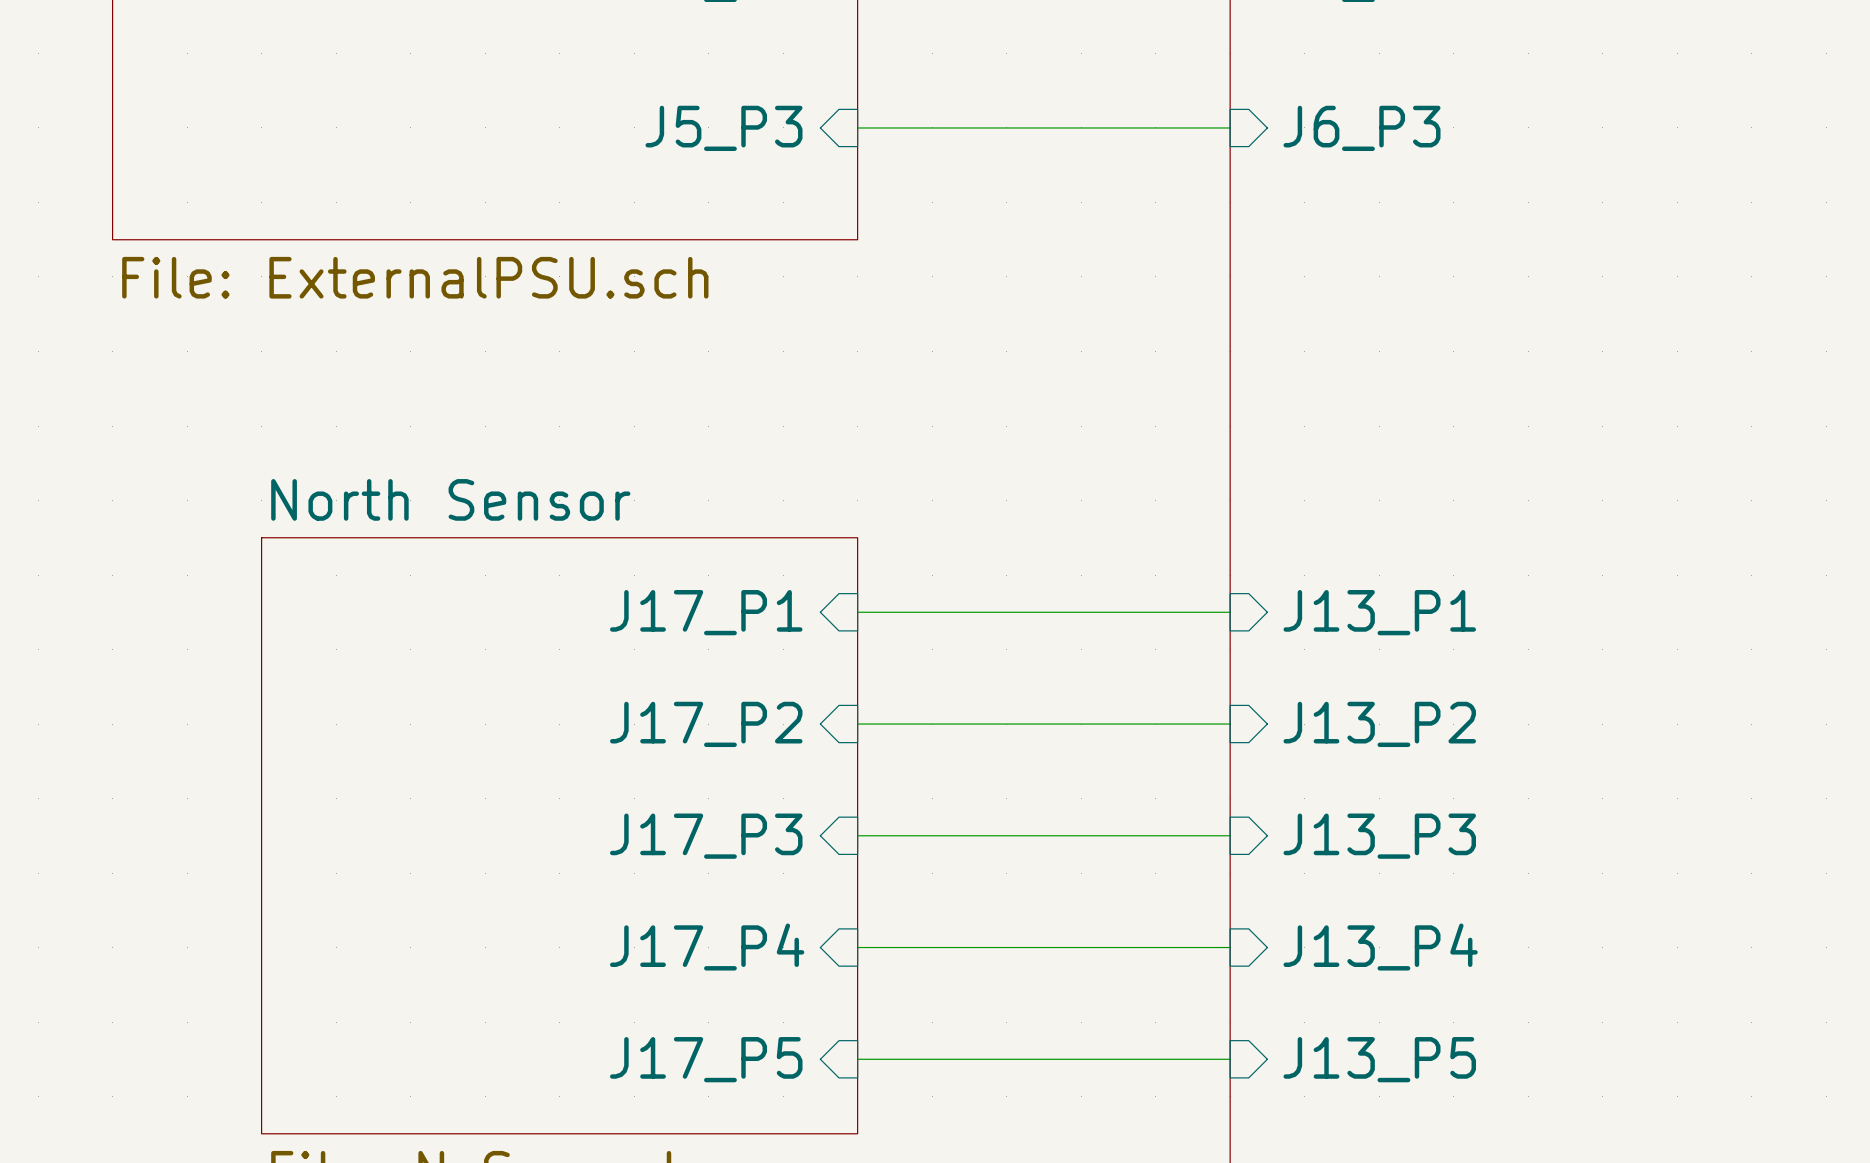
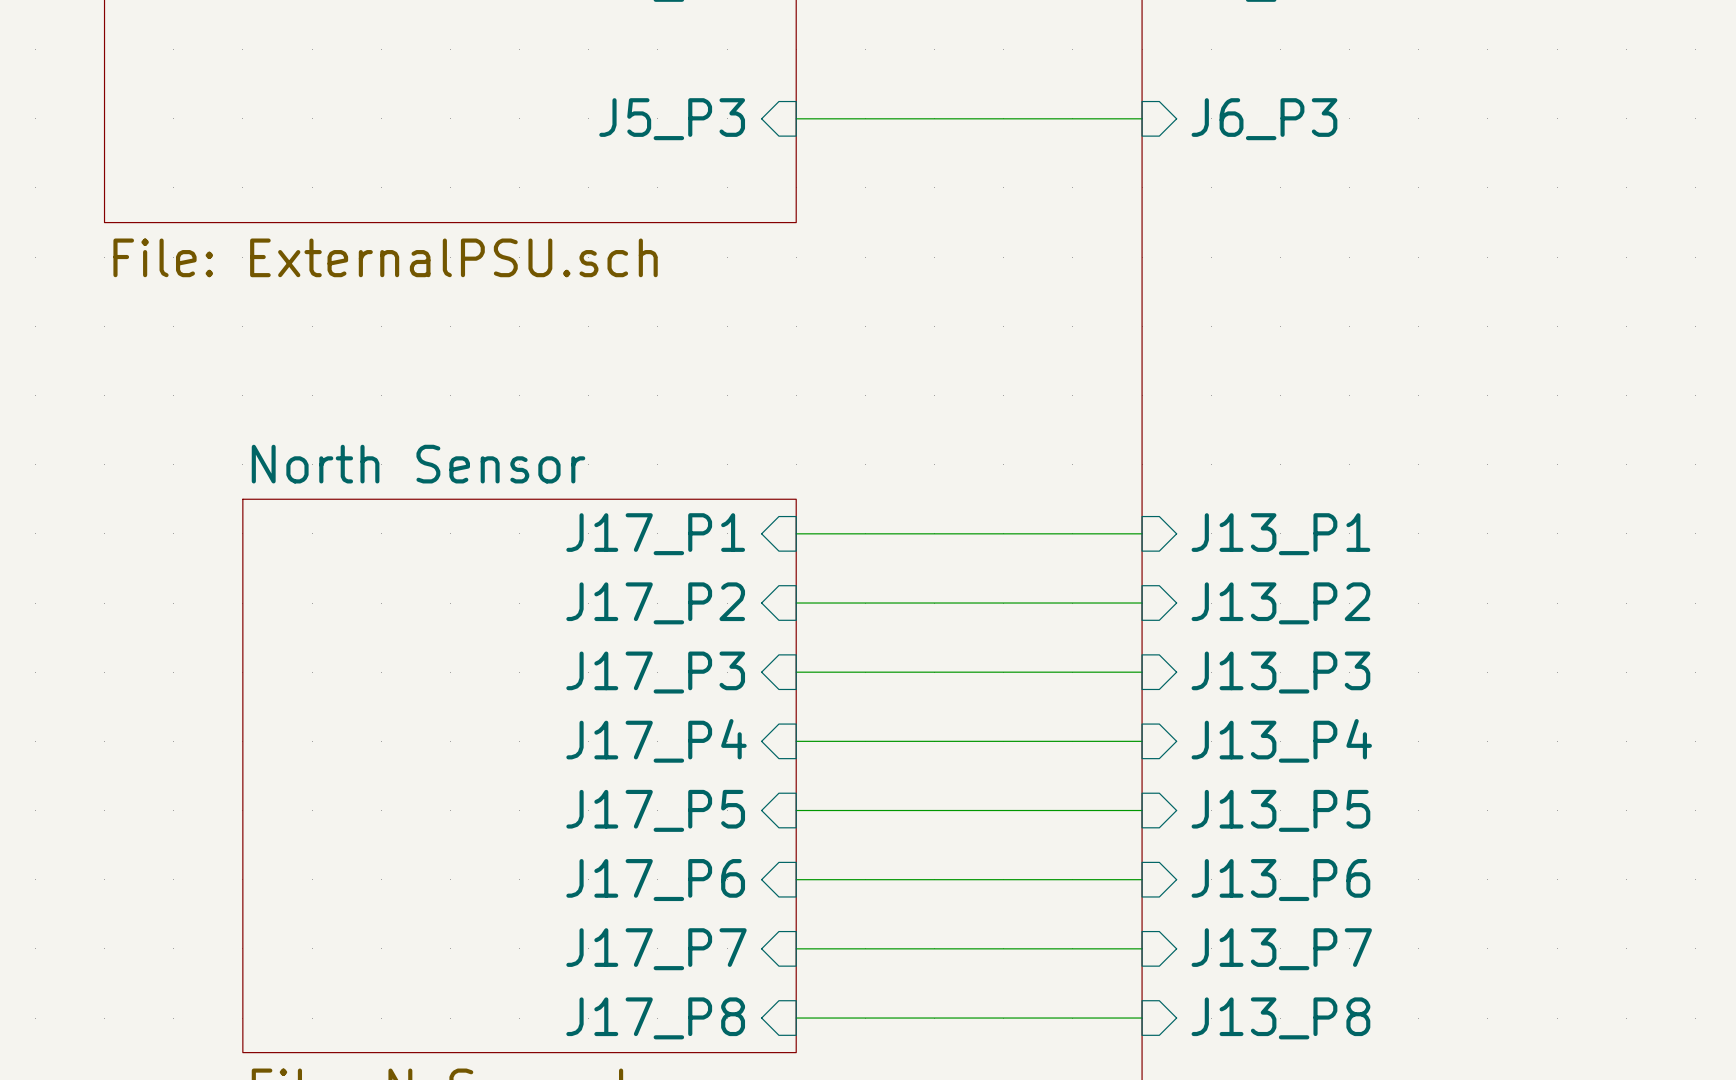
sheet pin position: J17_P1 (706, 612) -> J17_P1 (655, 534)
wire: (857, 612) (1230, 612) -> (796, 533) (1142, 533)
sheet pin position: J13_P1 (1379, 612) -> J13_P1 (1280, 534)
sheet pin: none -> J17_P2 (655, 603)
wire: none -> (796, 603) (1142, 603)
sheet pin: none -> J13_P2 (1280, 603)
sheet pin: J17_P2 (706, 724) -> J17_P3 (655, 672)
sheet pin: J13_P2 (1379, 724) -> J13_P3 (1280, 672)
wire: (857, 835) (1230, 835) -> (796, 741) (1142, 741)
sheet pin: J17_P3 (706, 836) -> J17_P4 (656, 740)
sheet pin: J13_P3 (1379, 836) -> J13_P4 (1281, 740)
wire: none -> (796, 810) (1142, 810)
sheet pin: J17_P4 (707, 947) -> J17_P6 (655, 880)
sheet pin: J13_P4 (1380, 947) -> J13_P6 (1280, 880)
sheet pin: none -> J17_P7 (656, 949)
sheet pin: none -> J13_P7 (1281, 949)
sheet pin position: J17_P5 (706, 1059) -> J17_P5 (655, 810)
wire: (857, 1059) (1230, 1059) -> (796, 948) (1142, 948)
sheet pin position: J13_P5 (1379, 1059) -> J13_P5 (1280, 810)
sheet pin: none -> J17_P8 (655, 1018)
wire: none -> (796, 1018) (1142, 1018)
sheet pin: none -> J13_P8 (1280, 1018)

